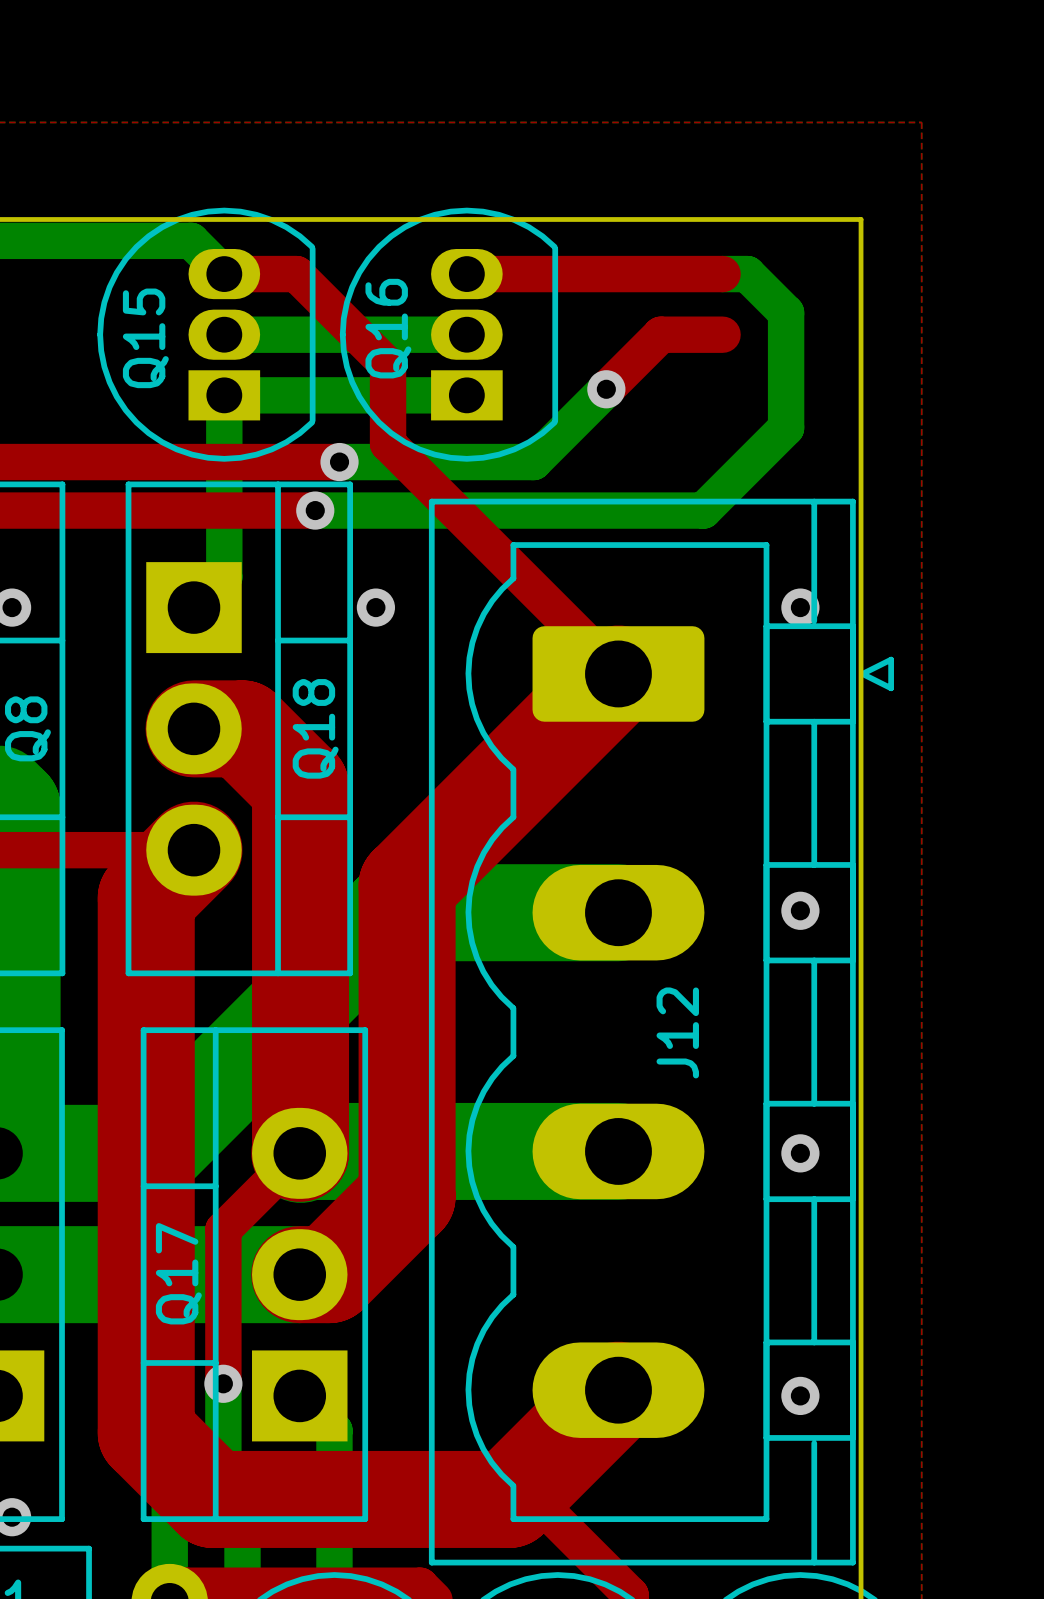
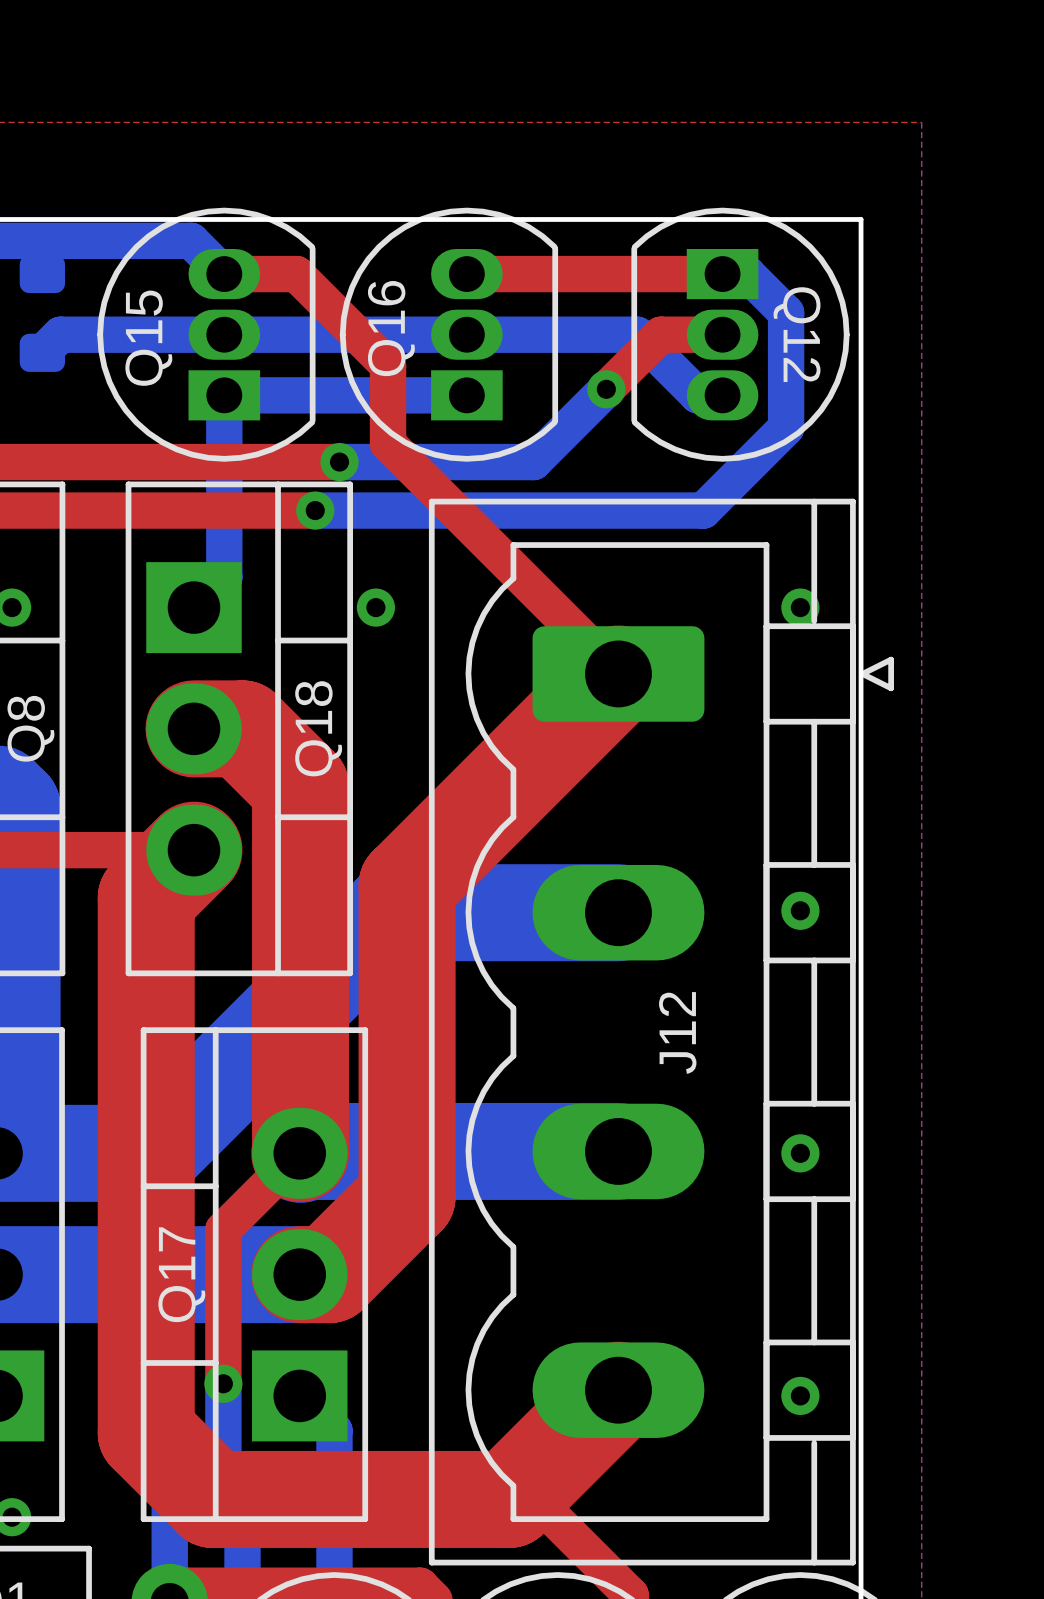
part: none -> (42, 313)
bottom track: none -> (224, 334) (60, 334) (42, 352)
bottom track: none -> (466, 334) (637, 334) (697, 395) (722, 395)
Q12: none -> (740, 334)

